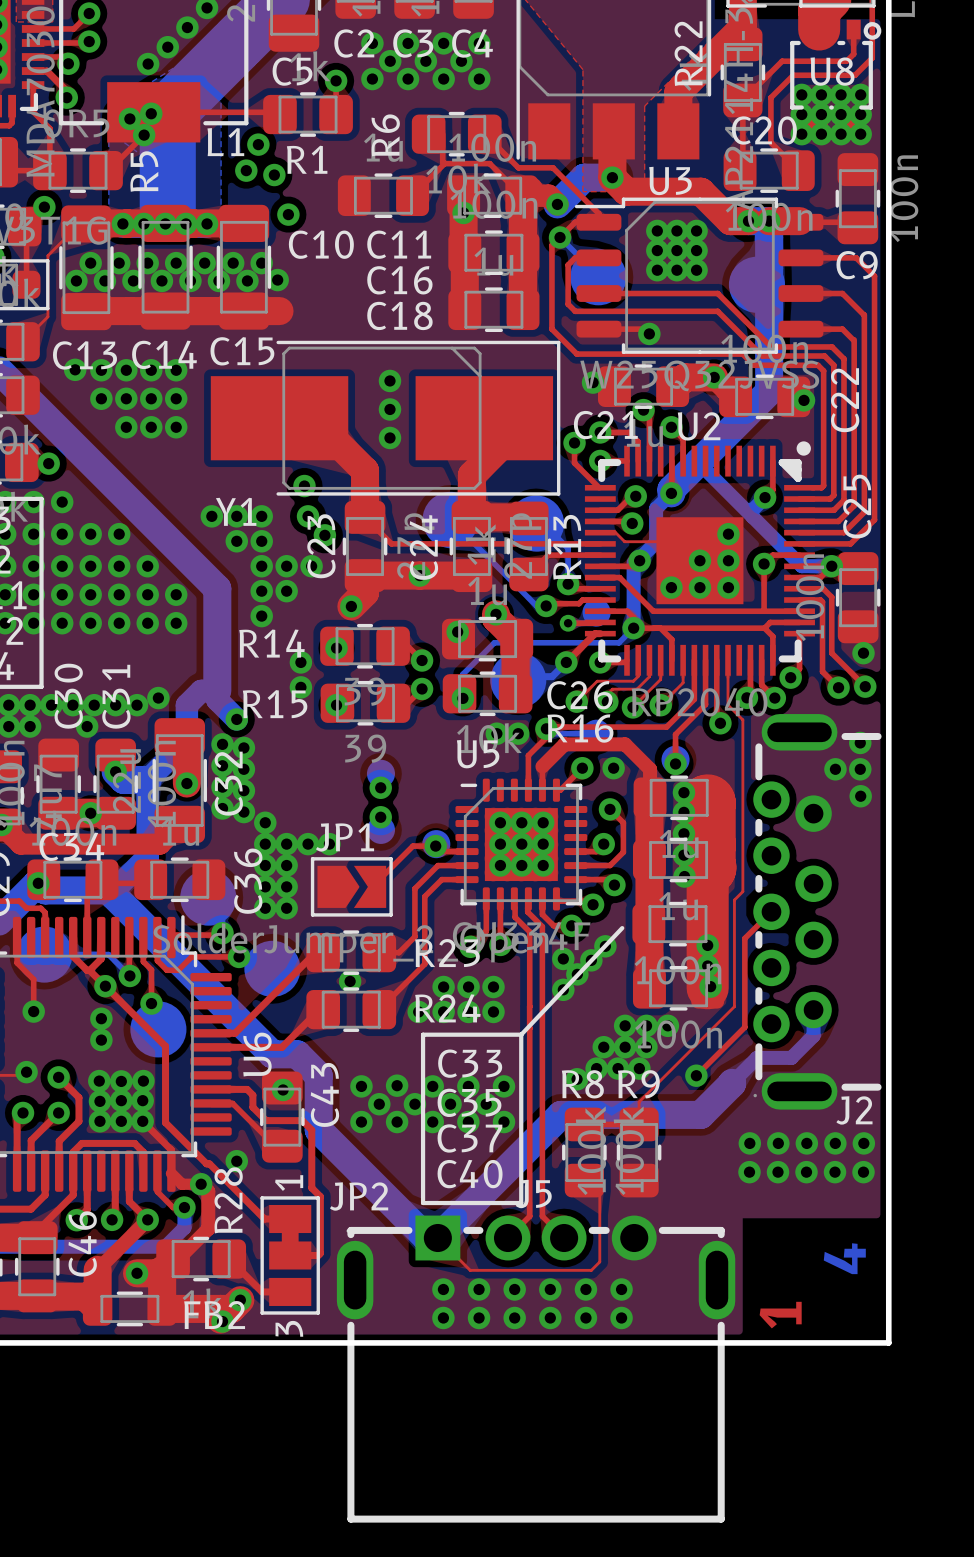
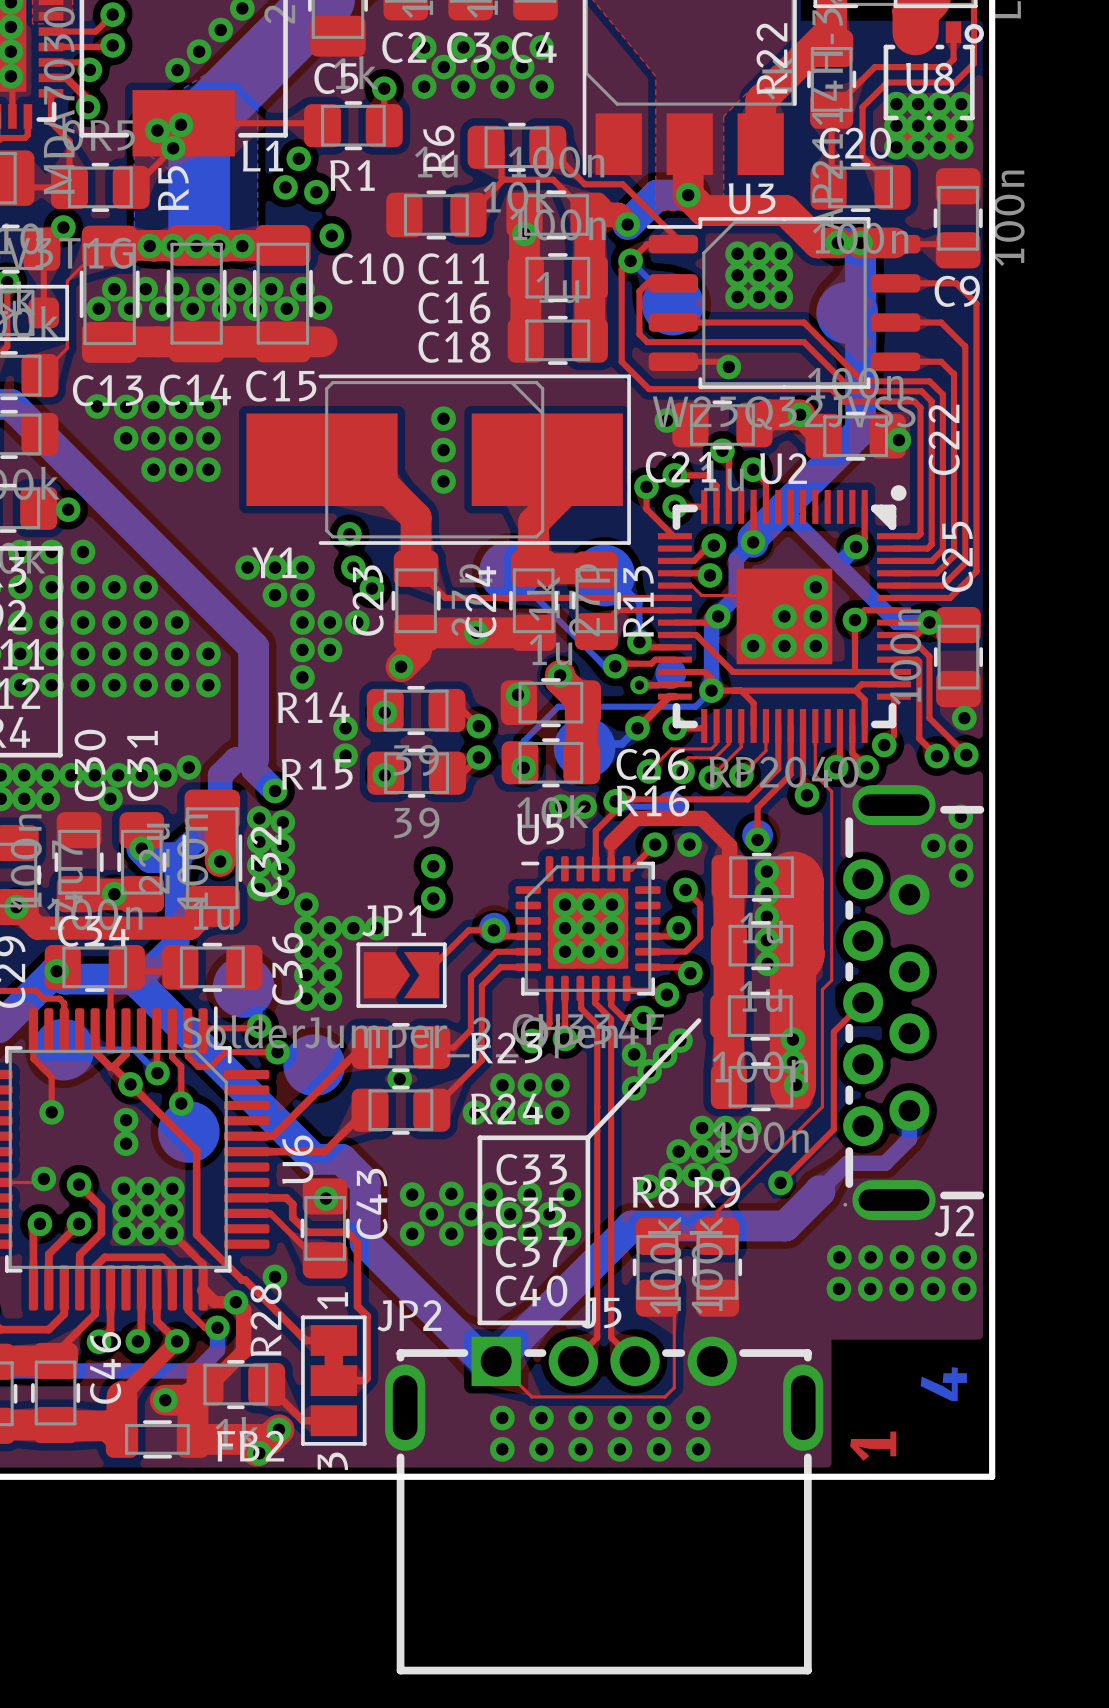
part: (380, 773) -> none
part: (380, 829) -> none

